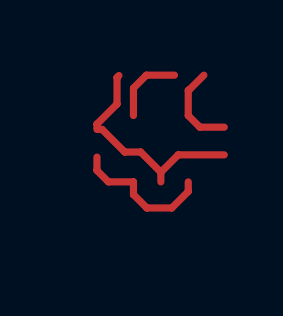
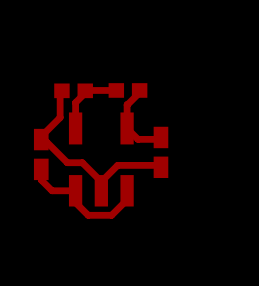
part: none -> (73, 90)
part: none -> (127, 90)
part: none -> (160, 152)
part: none -> (41, 154)
part: none -> (101, 159)

